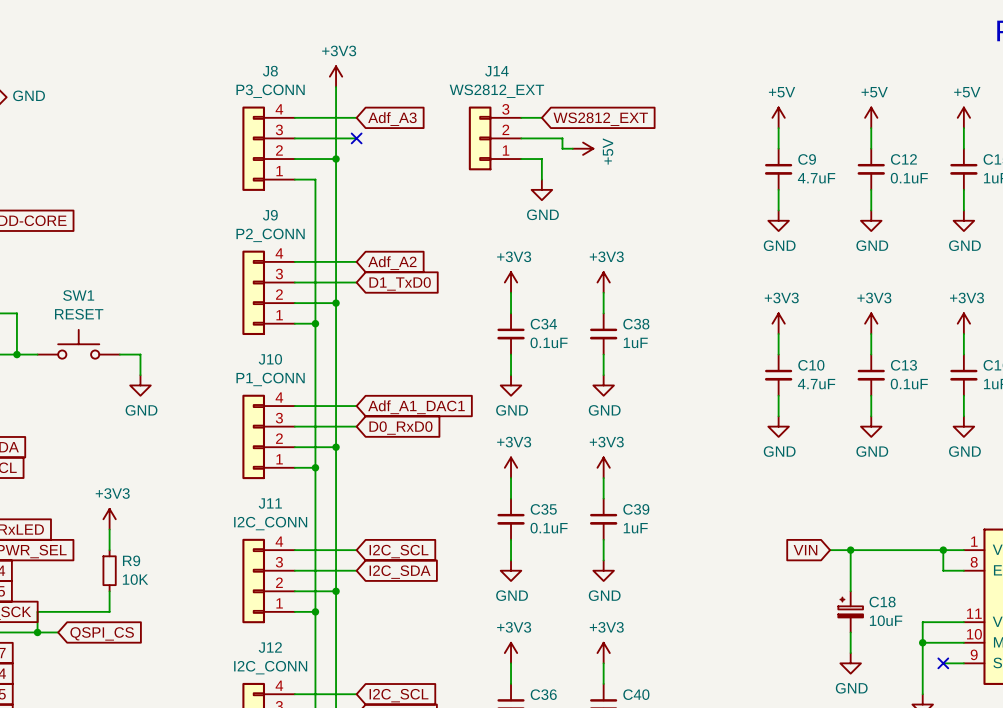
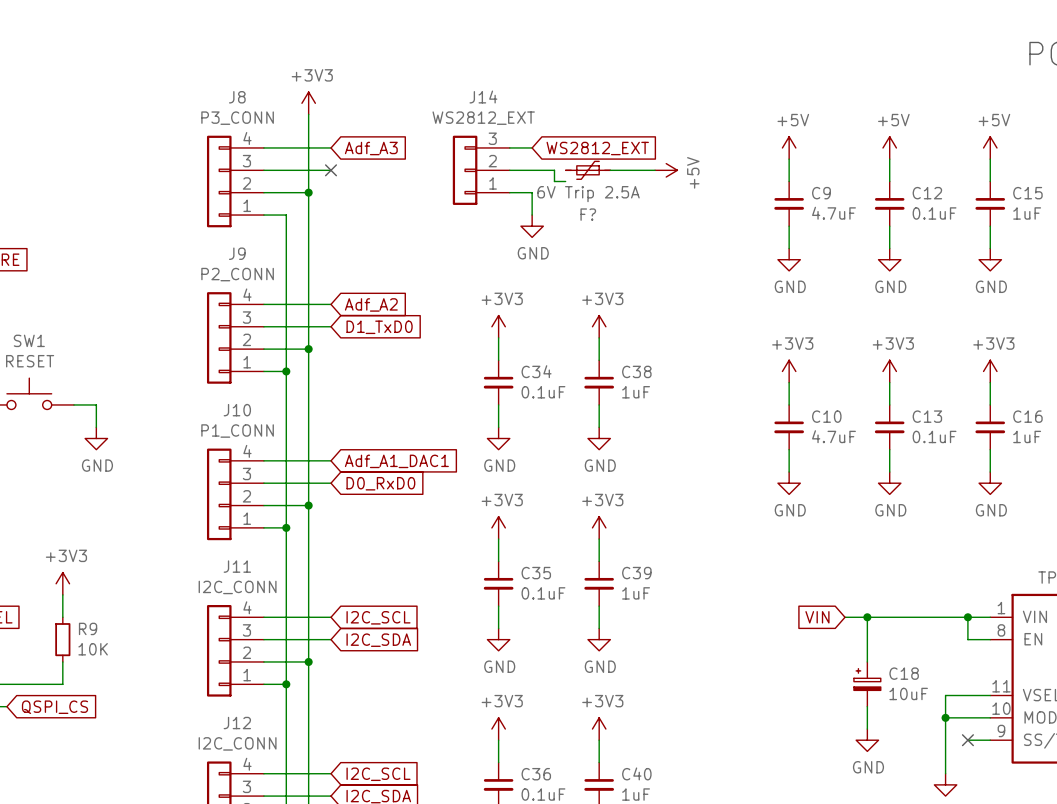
F?: none -> 6V Trip 2.5A (588, 170)
wire: none -> (610, 170) (655, 170)
power symbol position: +5V (583, 148) -> +5V (666, 170)

